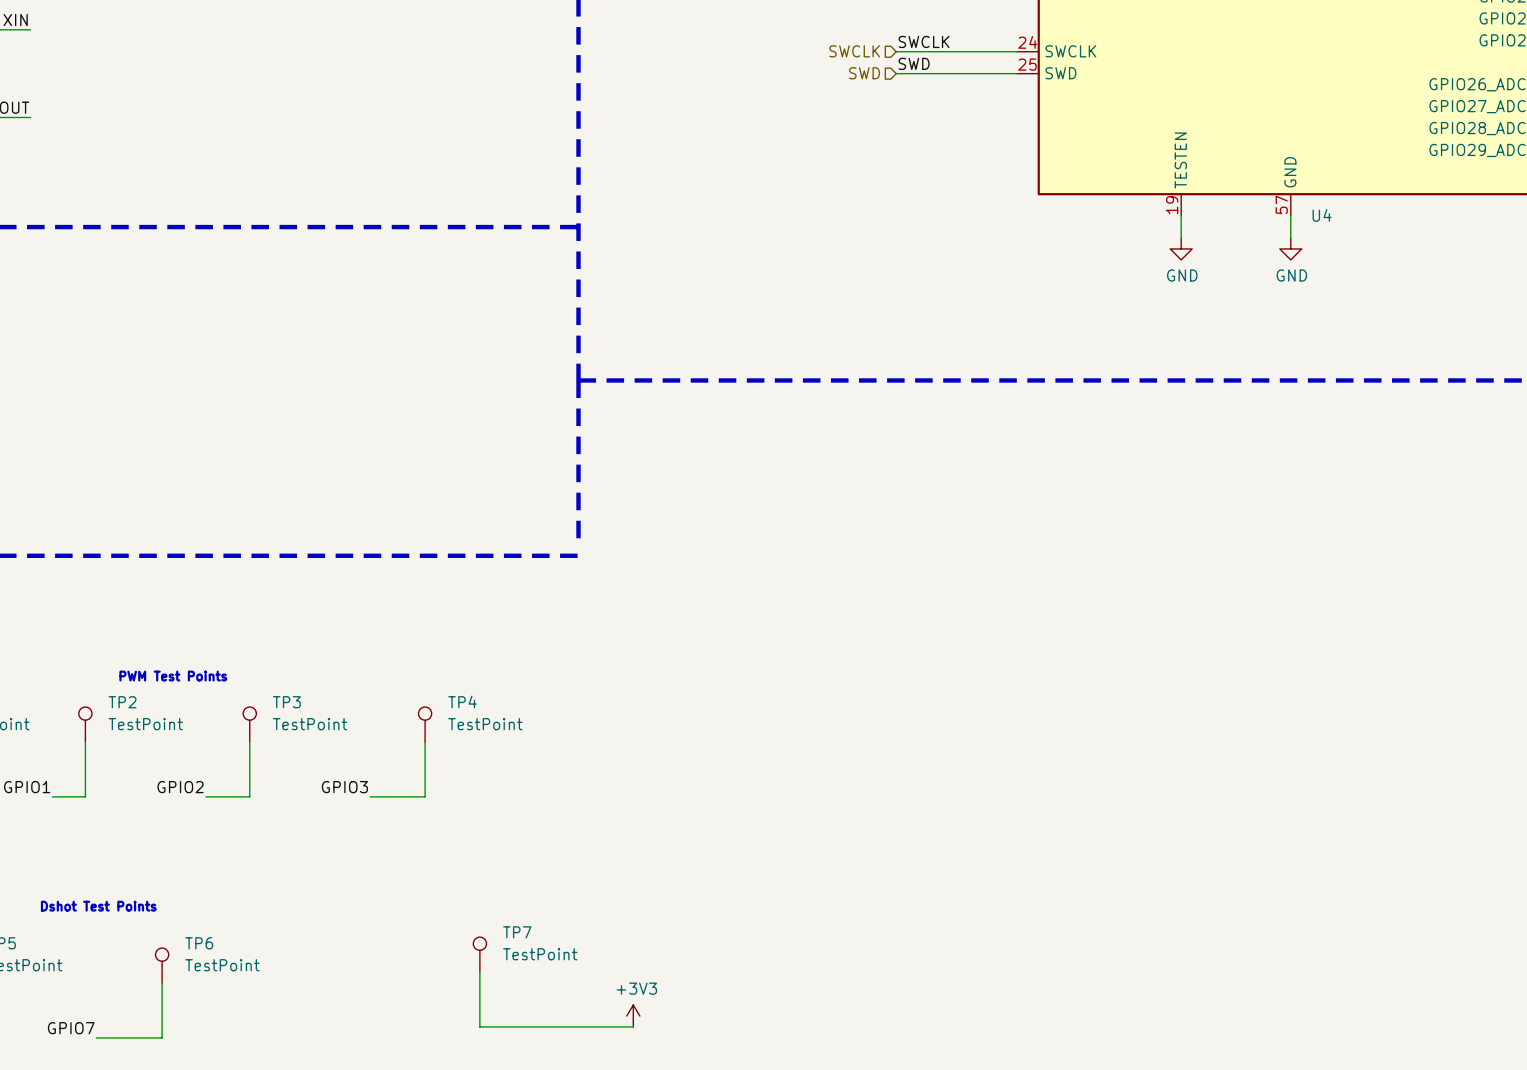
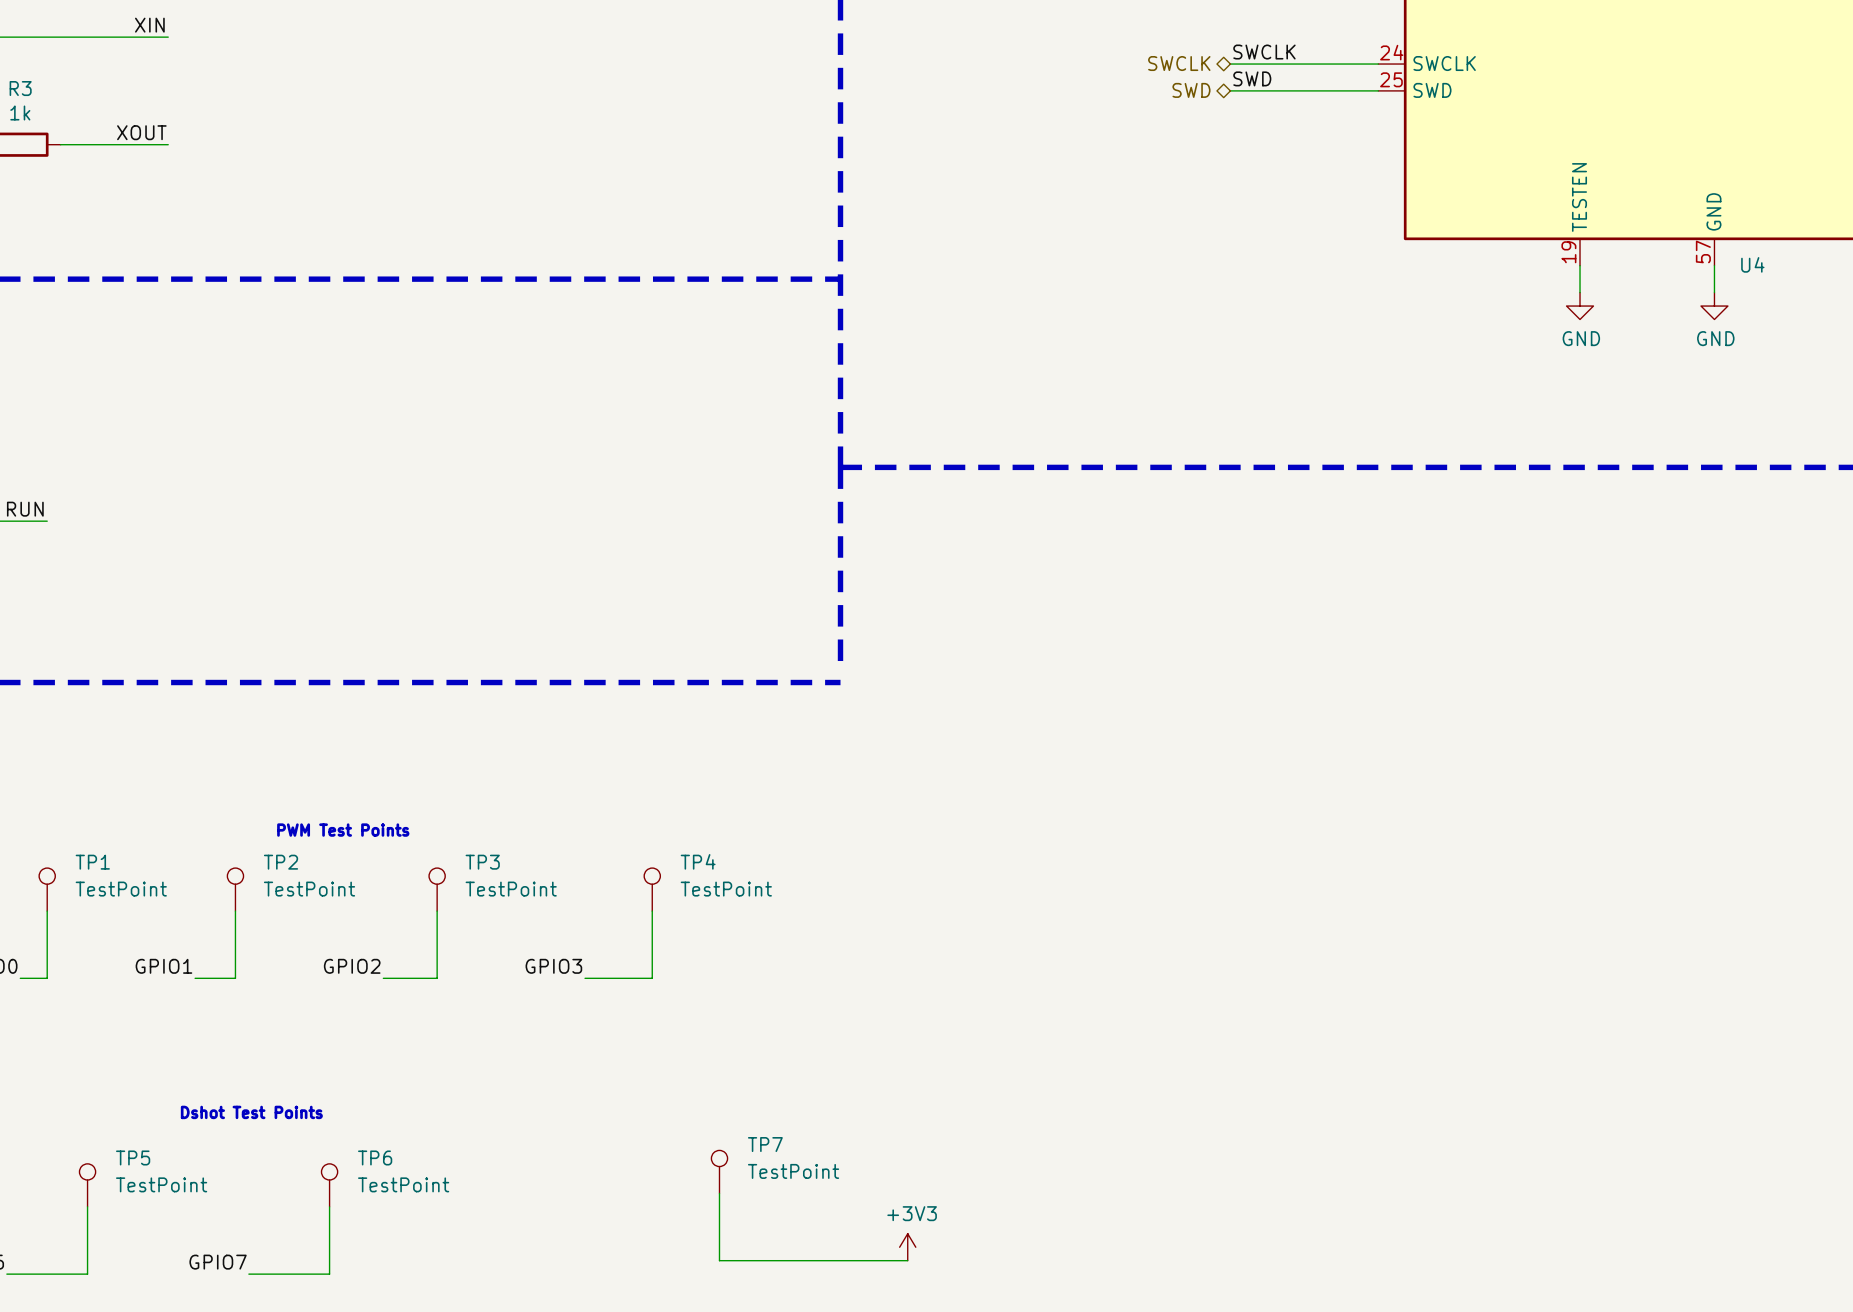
hierarchical label shape: input (854, 51) -> bidirectional (1179, 63)
hierarchical label shape: input (864, 73) -> bidirectional (1191, 90)

